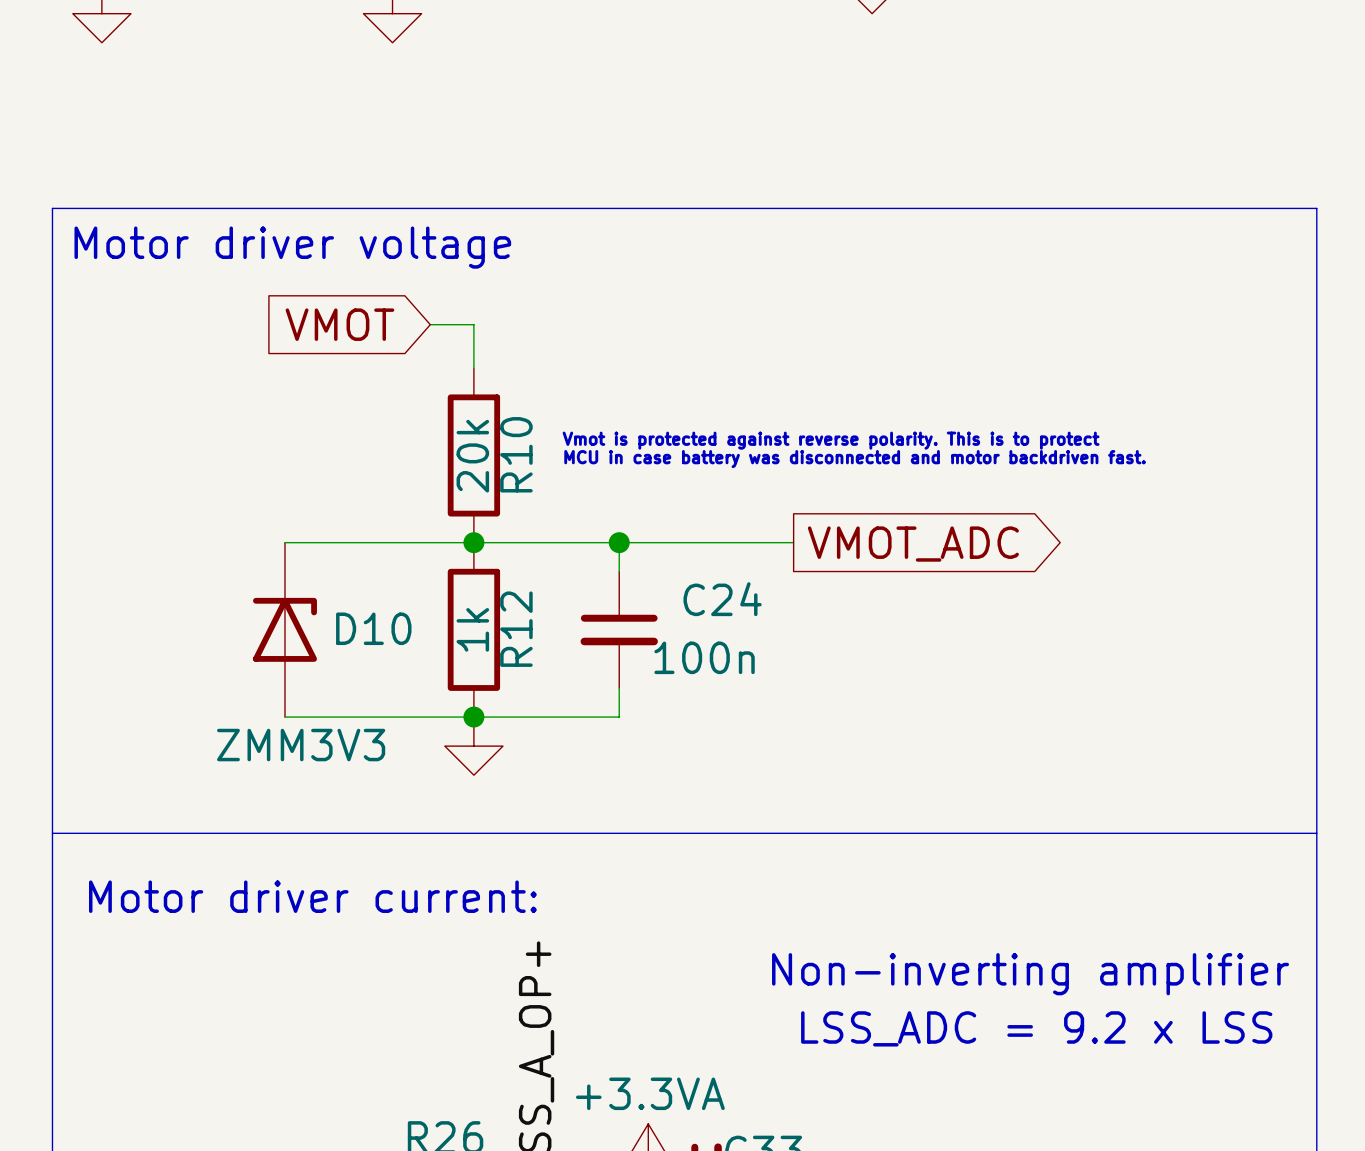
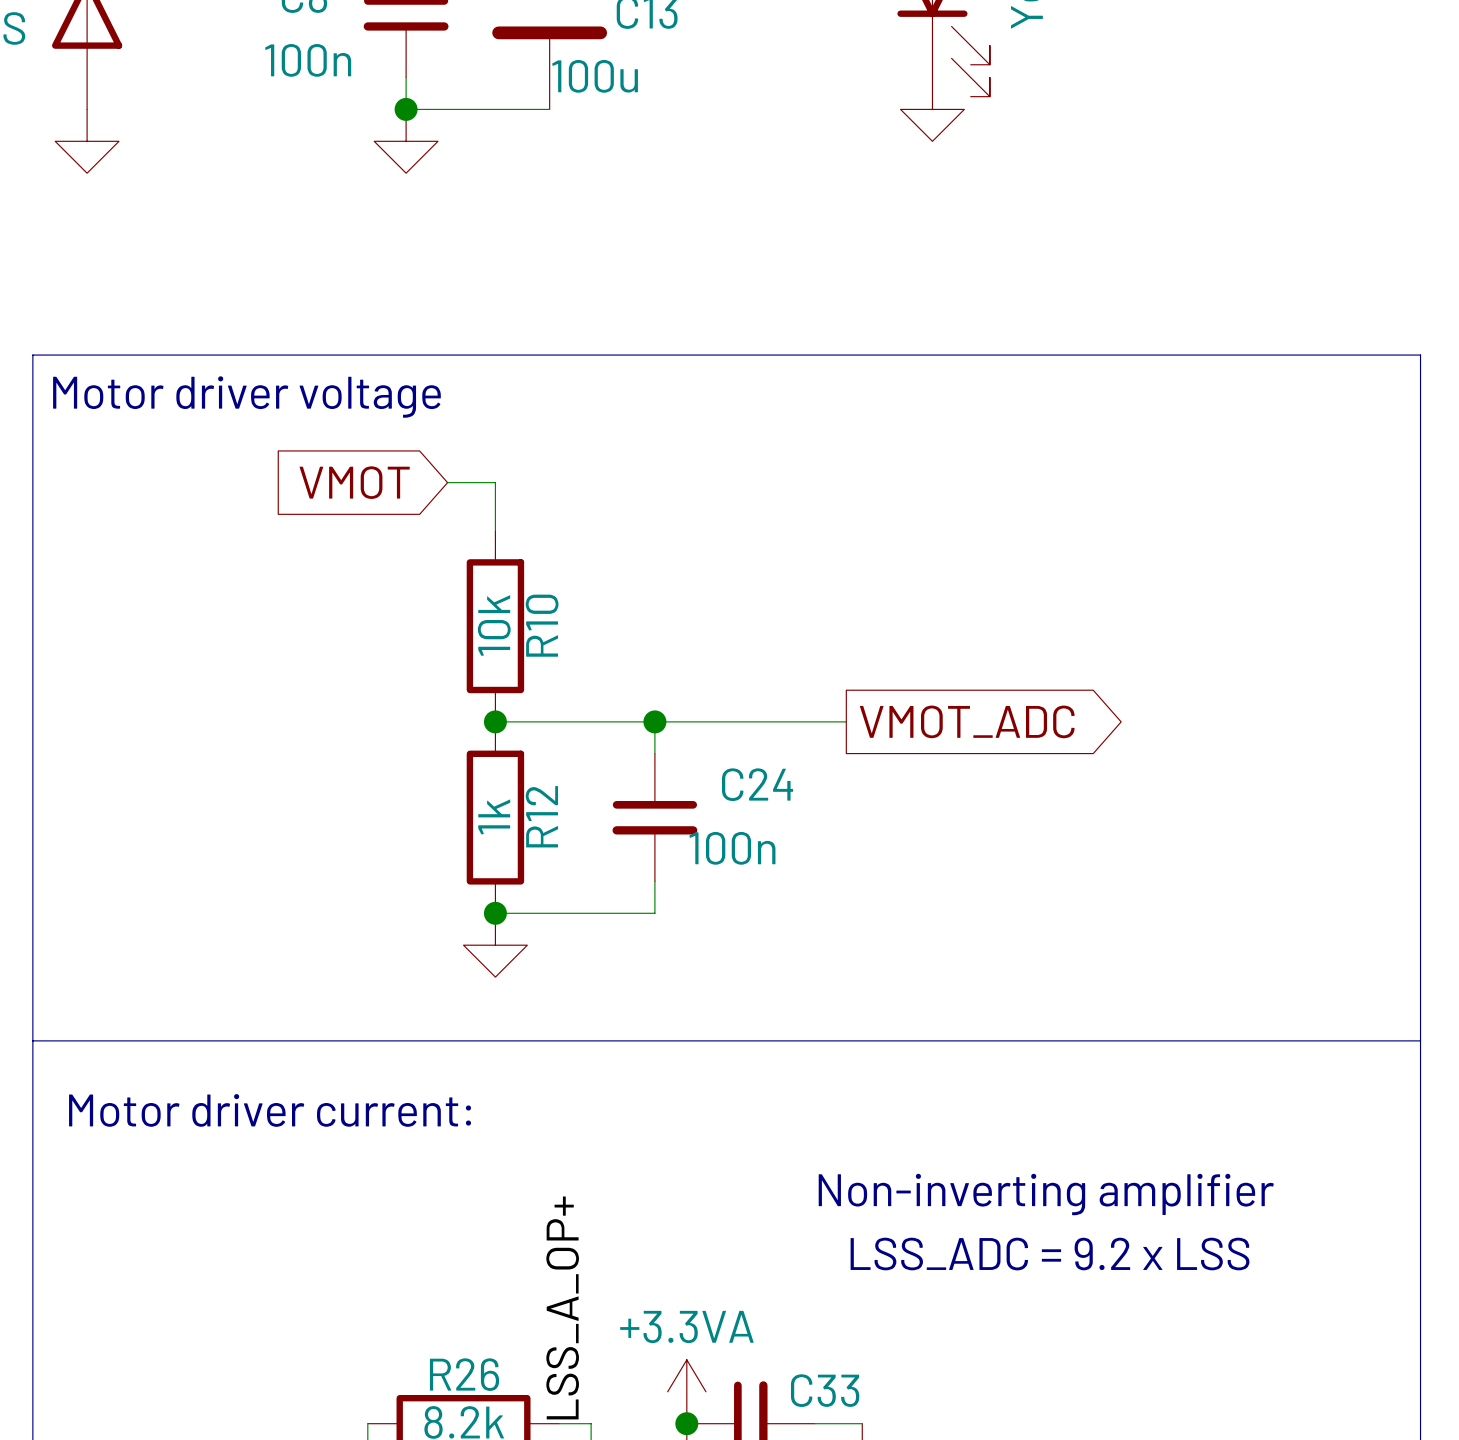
text: Vmot is protected against reverse polarity. This is to protect (831, 440) -> none
R10 value: 20k (472, 456) -> 10k (494, 625)
text: MCU in case battery was disconnected and motor backdriven fast. (855, 459) -> none
wire: (284, 542) (473, 542) -> none
D10: ZMM3V3 (284, 629) -> none
wire: (284, 717) (473, 717) -> none

